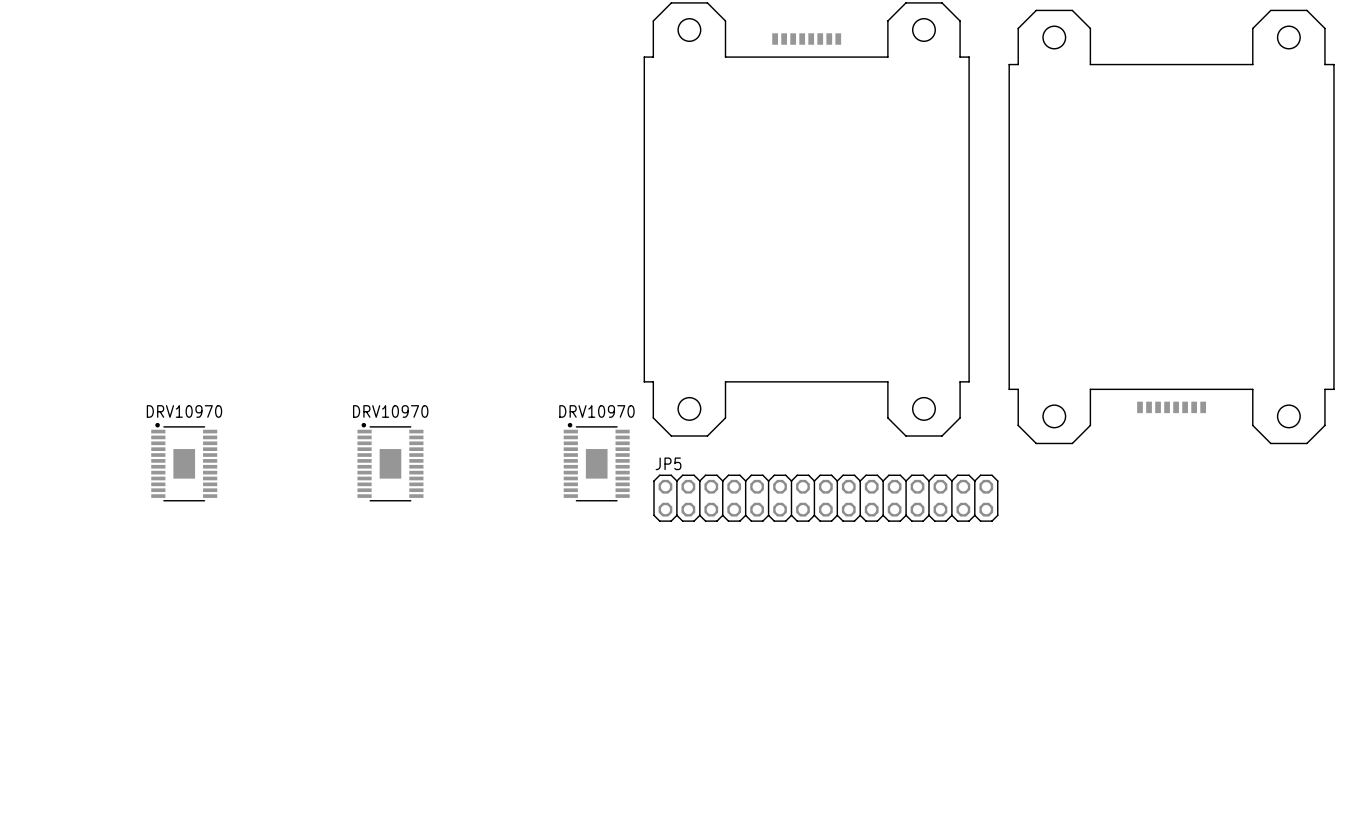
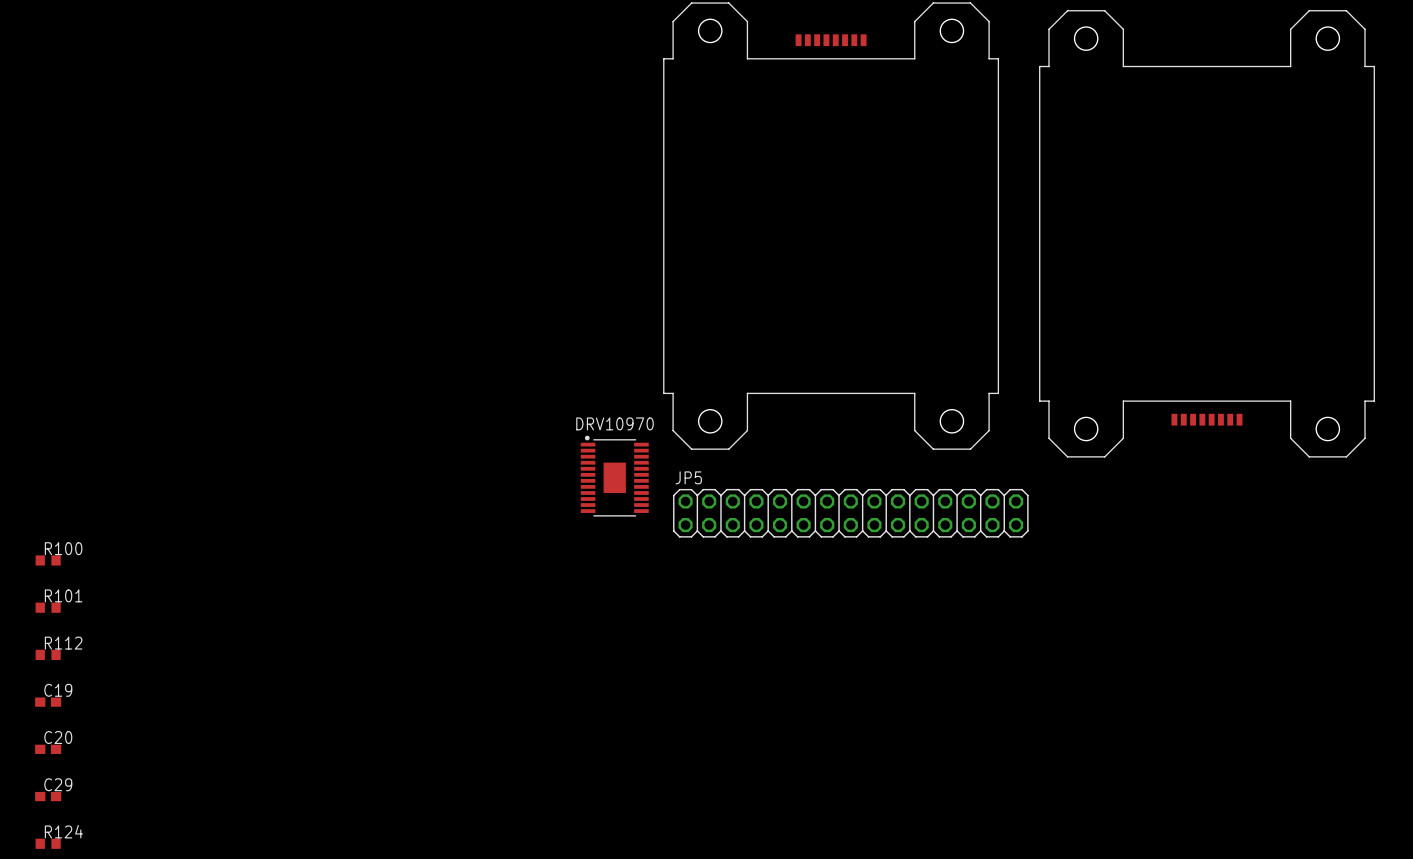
part: (184, 462) -> none
part: (390, 462) -> none
R100: none -> (48, 560)
R101: none -> (48, 607)
R112: none -> (48, 654)
C19: none -> (48, 702)
C20: none -> (48, 749)
C29: none -> (48, 796)
R124: none -> (48, 843)

